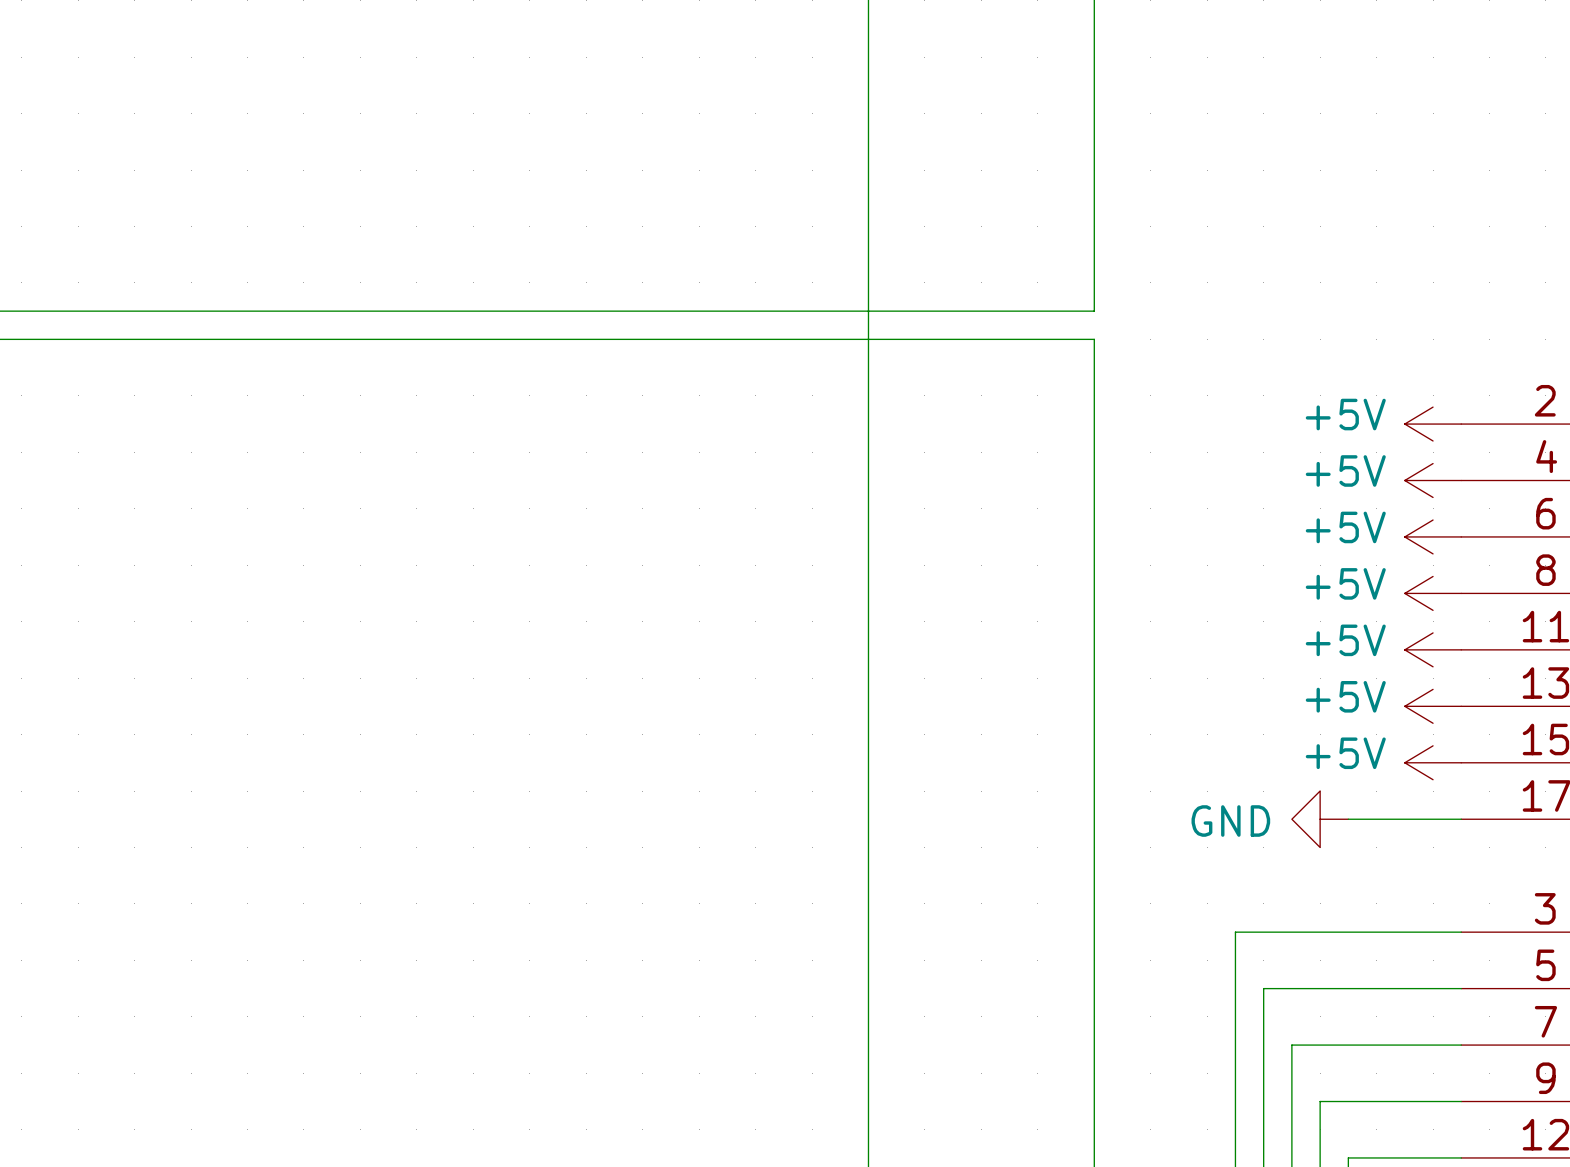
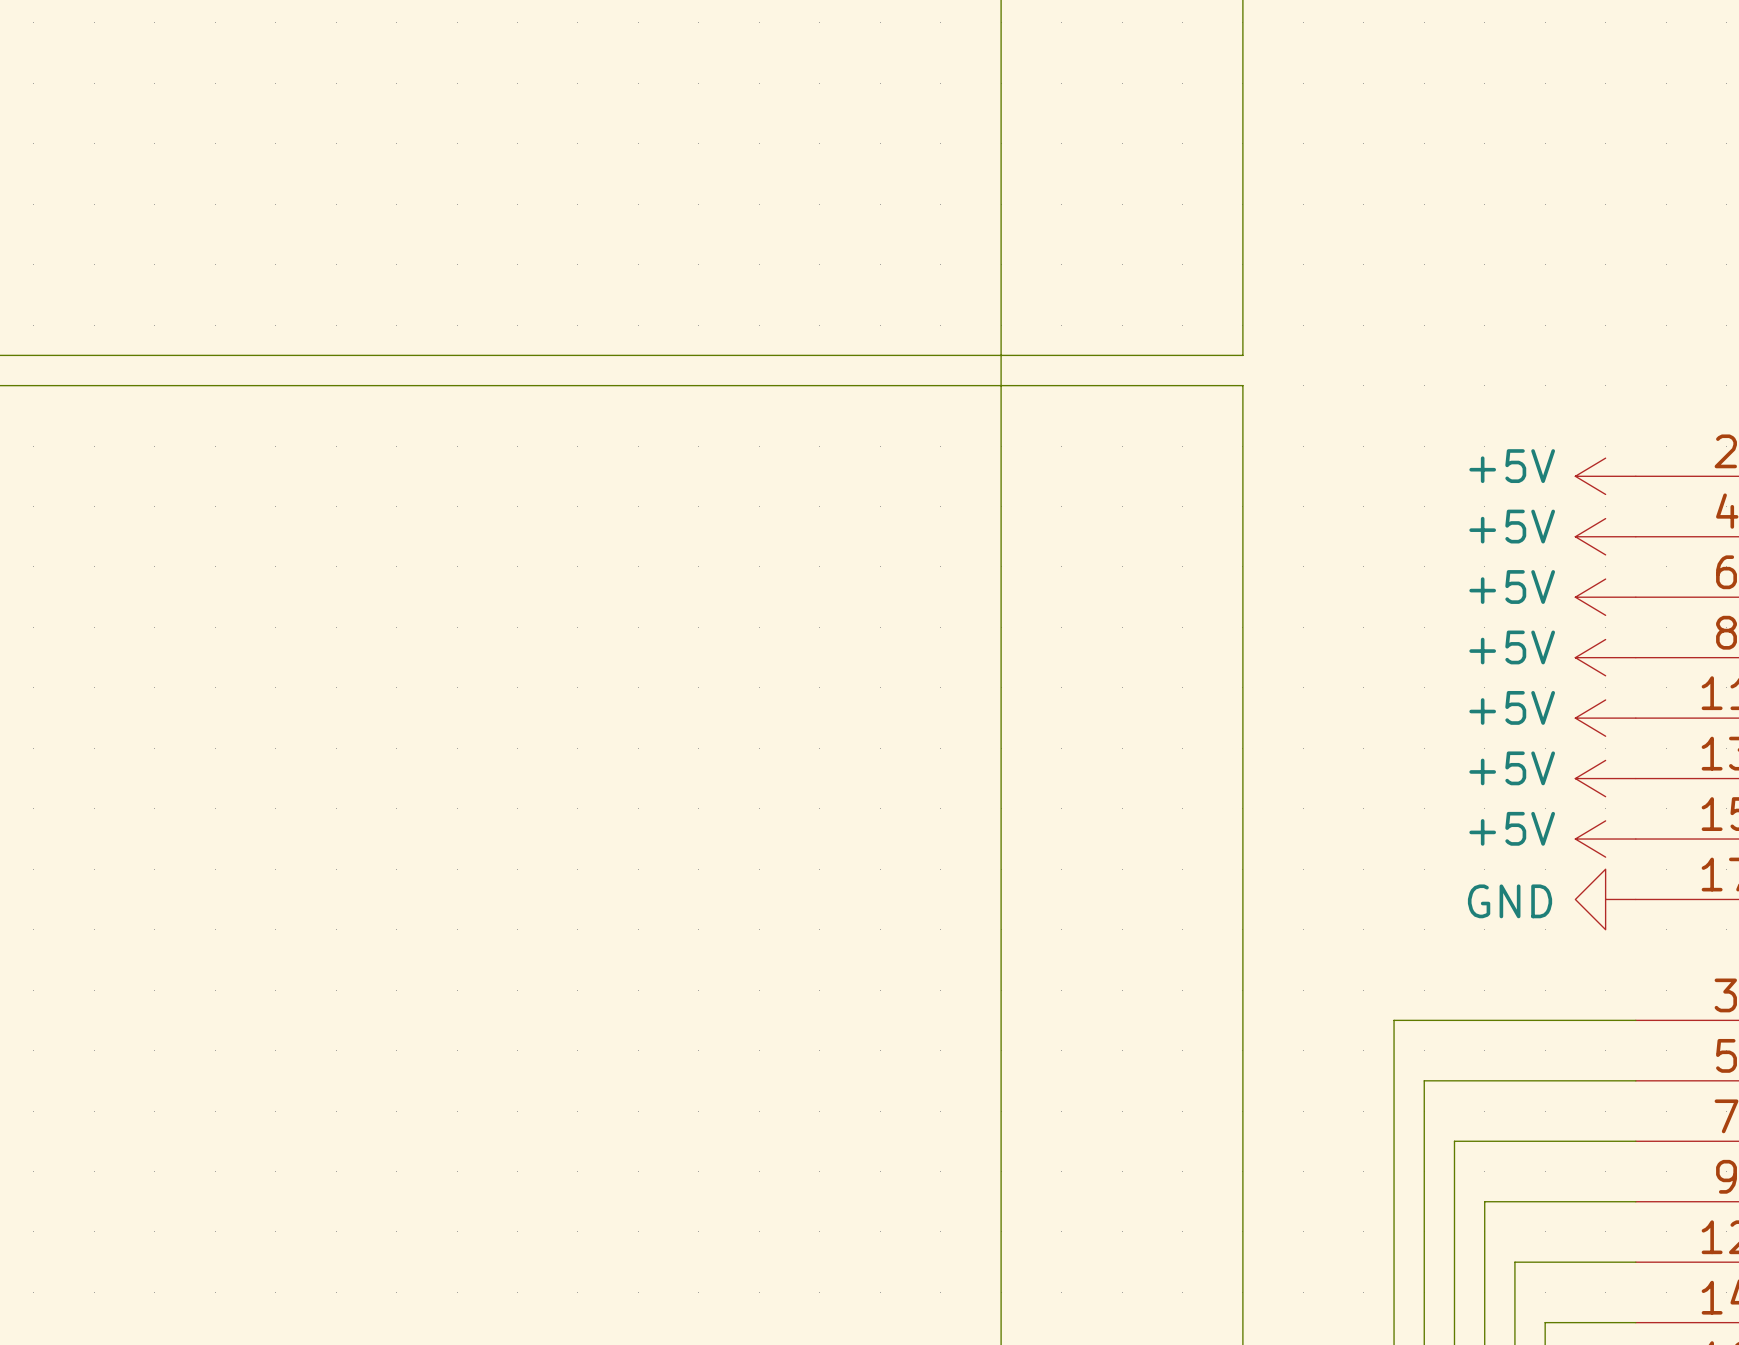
power symbol position: GND (1320, 819) -> GND (1605, 899)
wire: (1348, 819) (1461, 819) -> none

